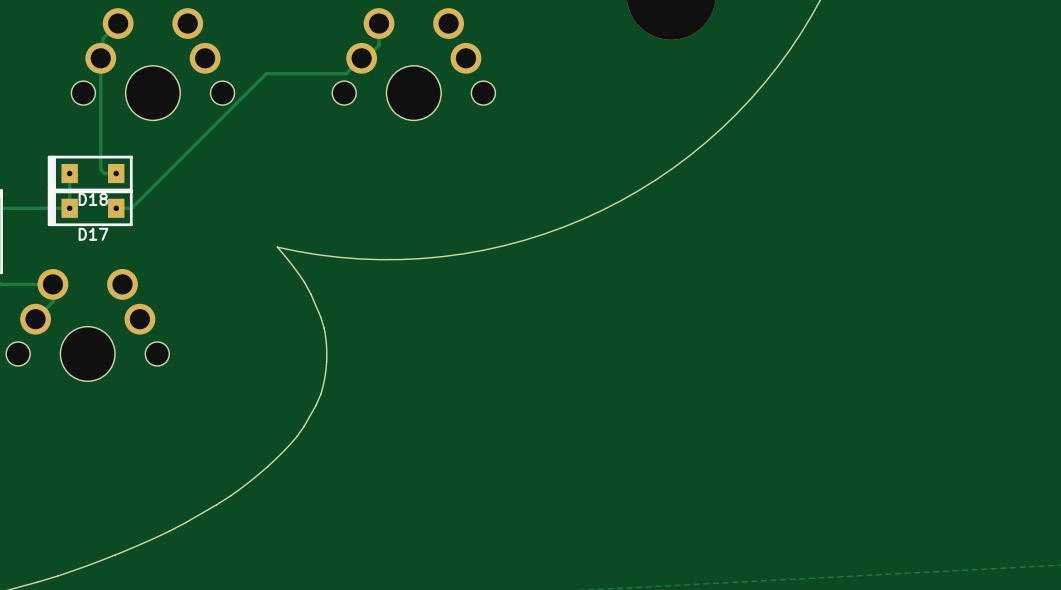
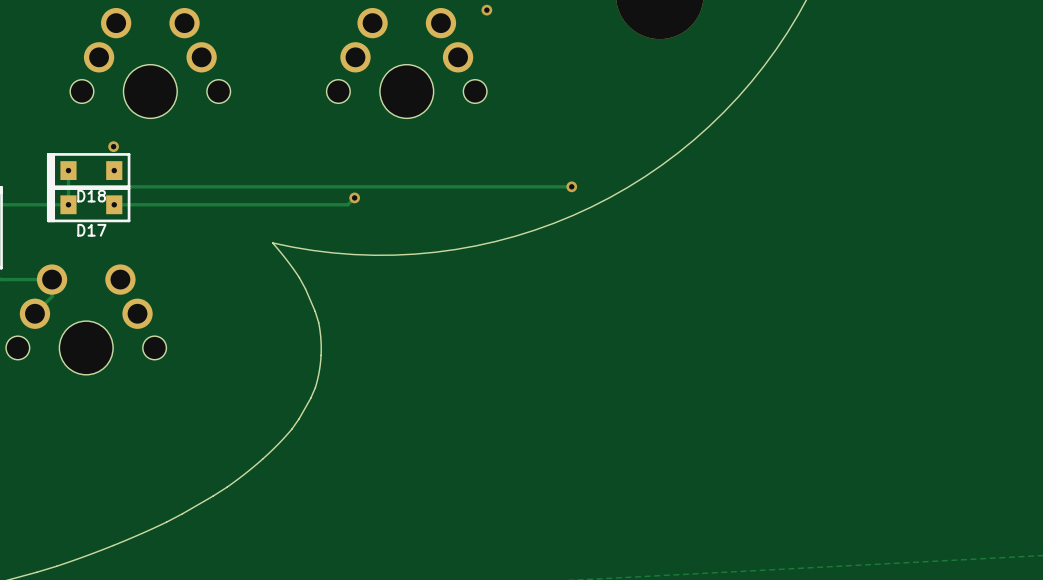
via: none -> (486, 10)
track: (118, 23) (102, 38) (102, 56) (100, 58) (100, 169) (104, 173) (116, 173) -> none
track: (379, 23) (379, 45) (366, 58) (361, 58) (346, 73) (266, 73) (131, 208) -> (354, 197) (347, 204) (129, 204)
via: none -> (113, 146)
track: none -> (571, 186) (69, 186)
via: none -> (571, 186)
via: none -> (354, 197)

